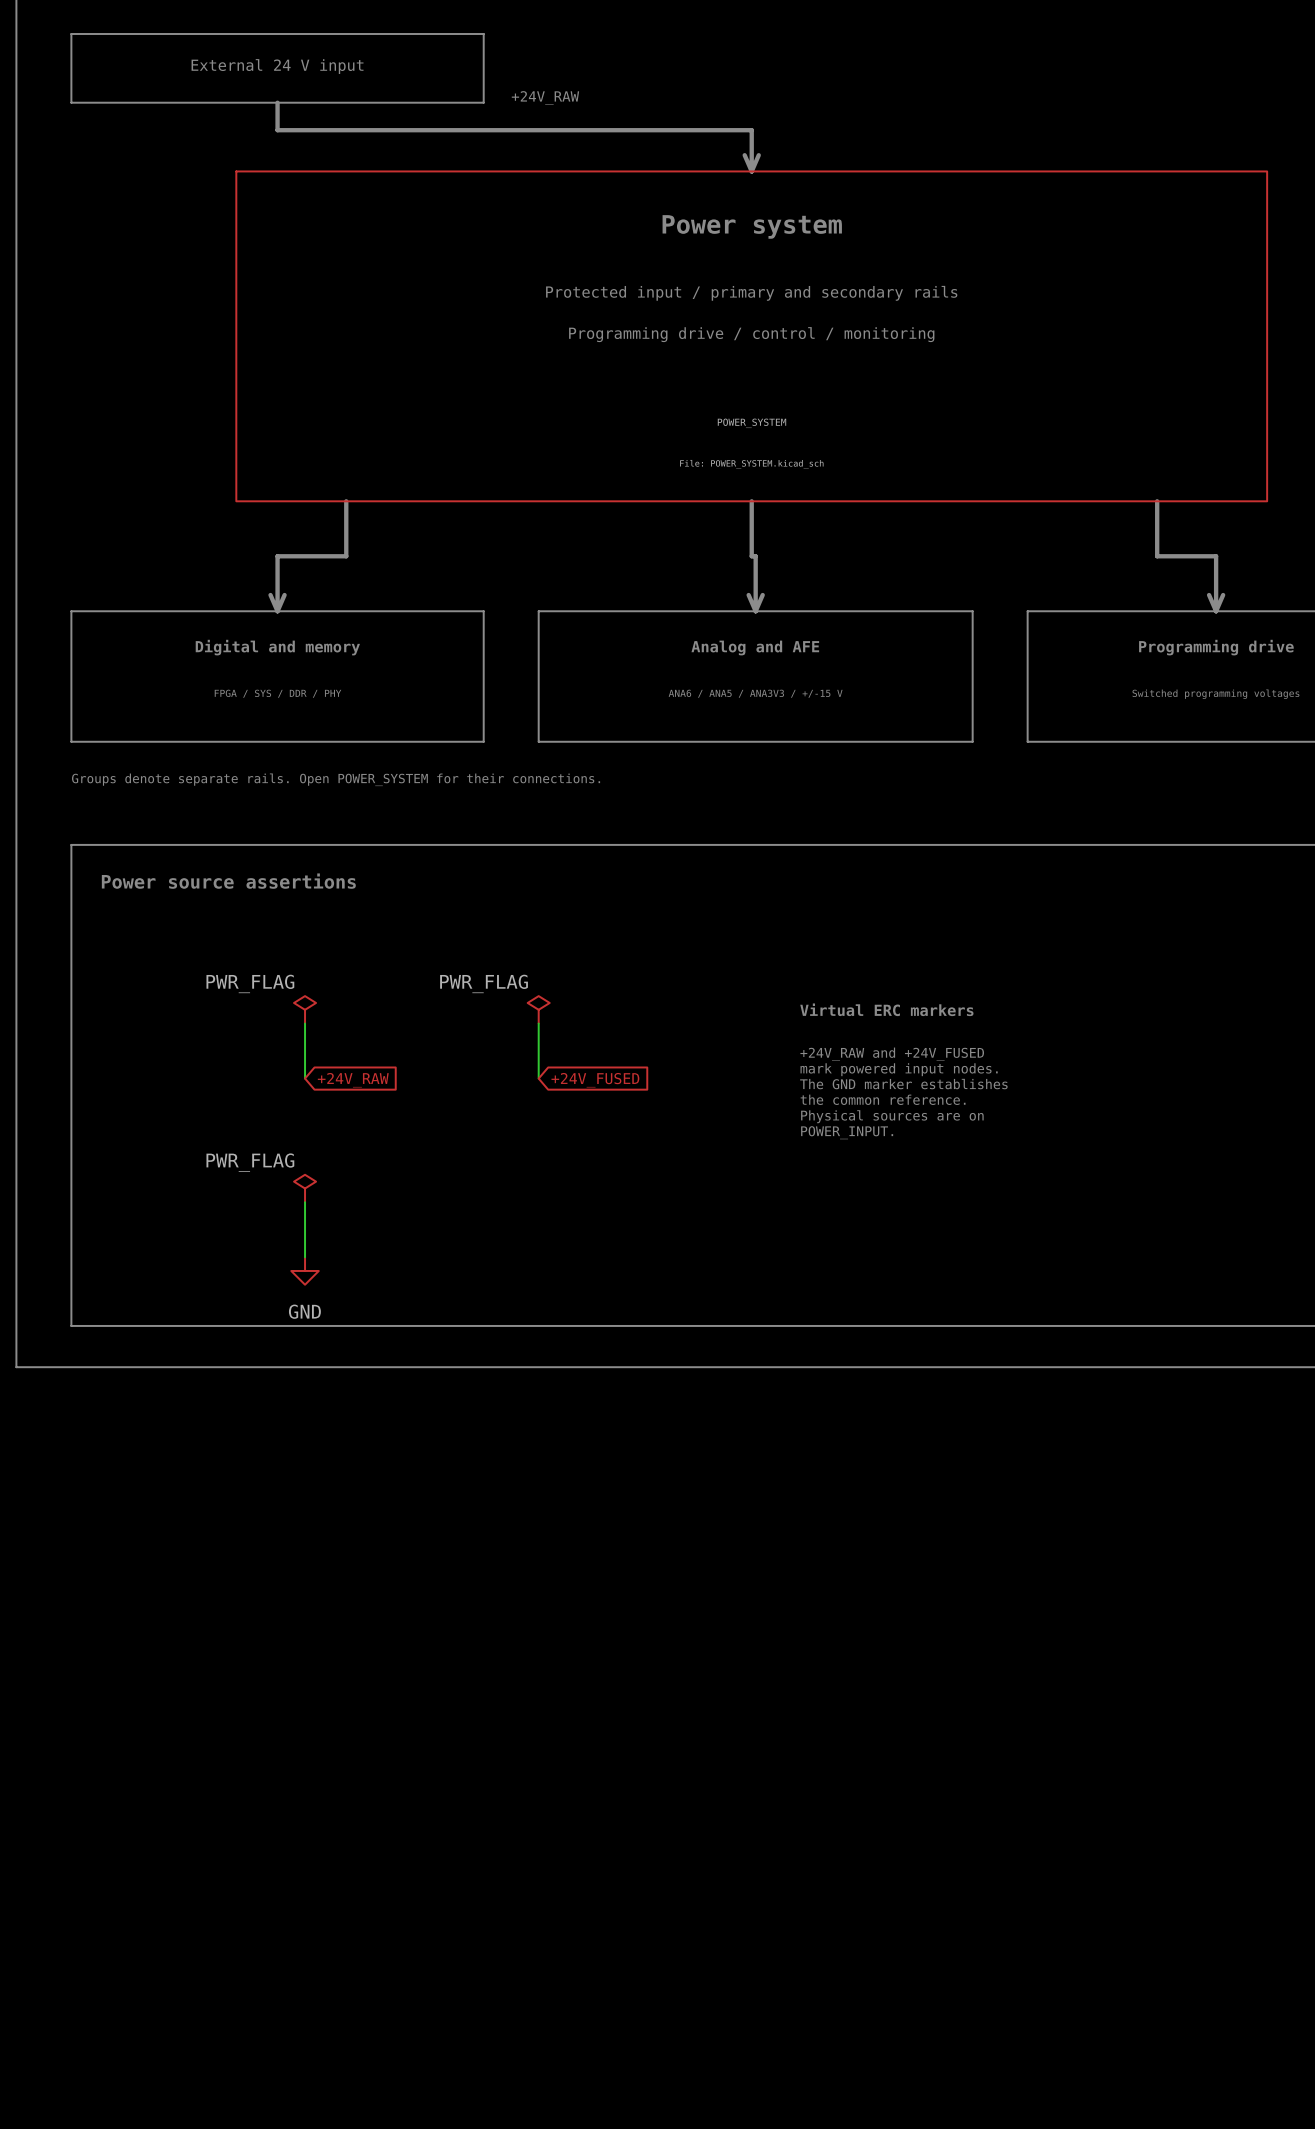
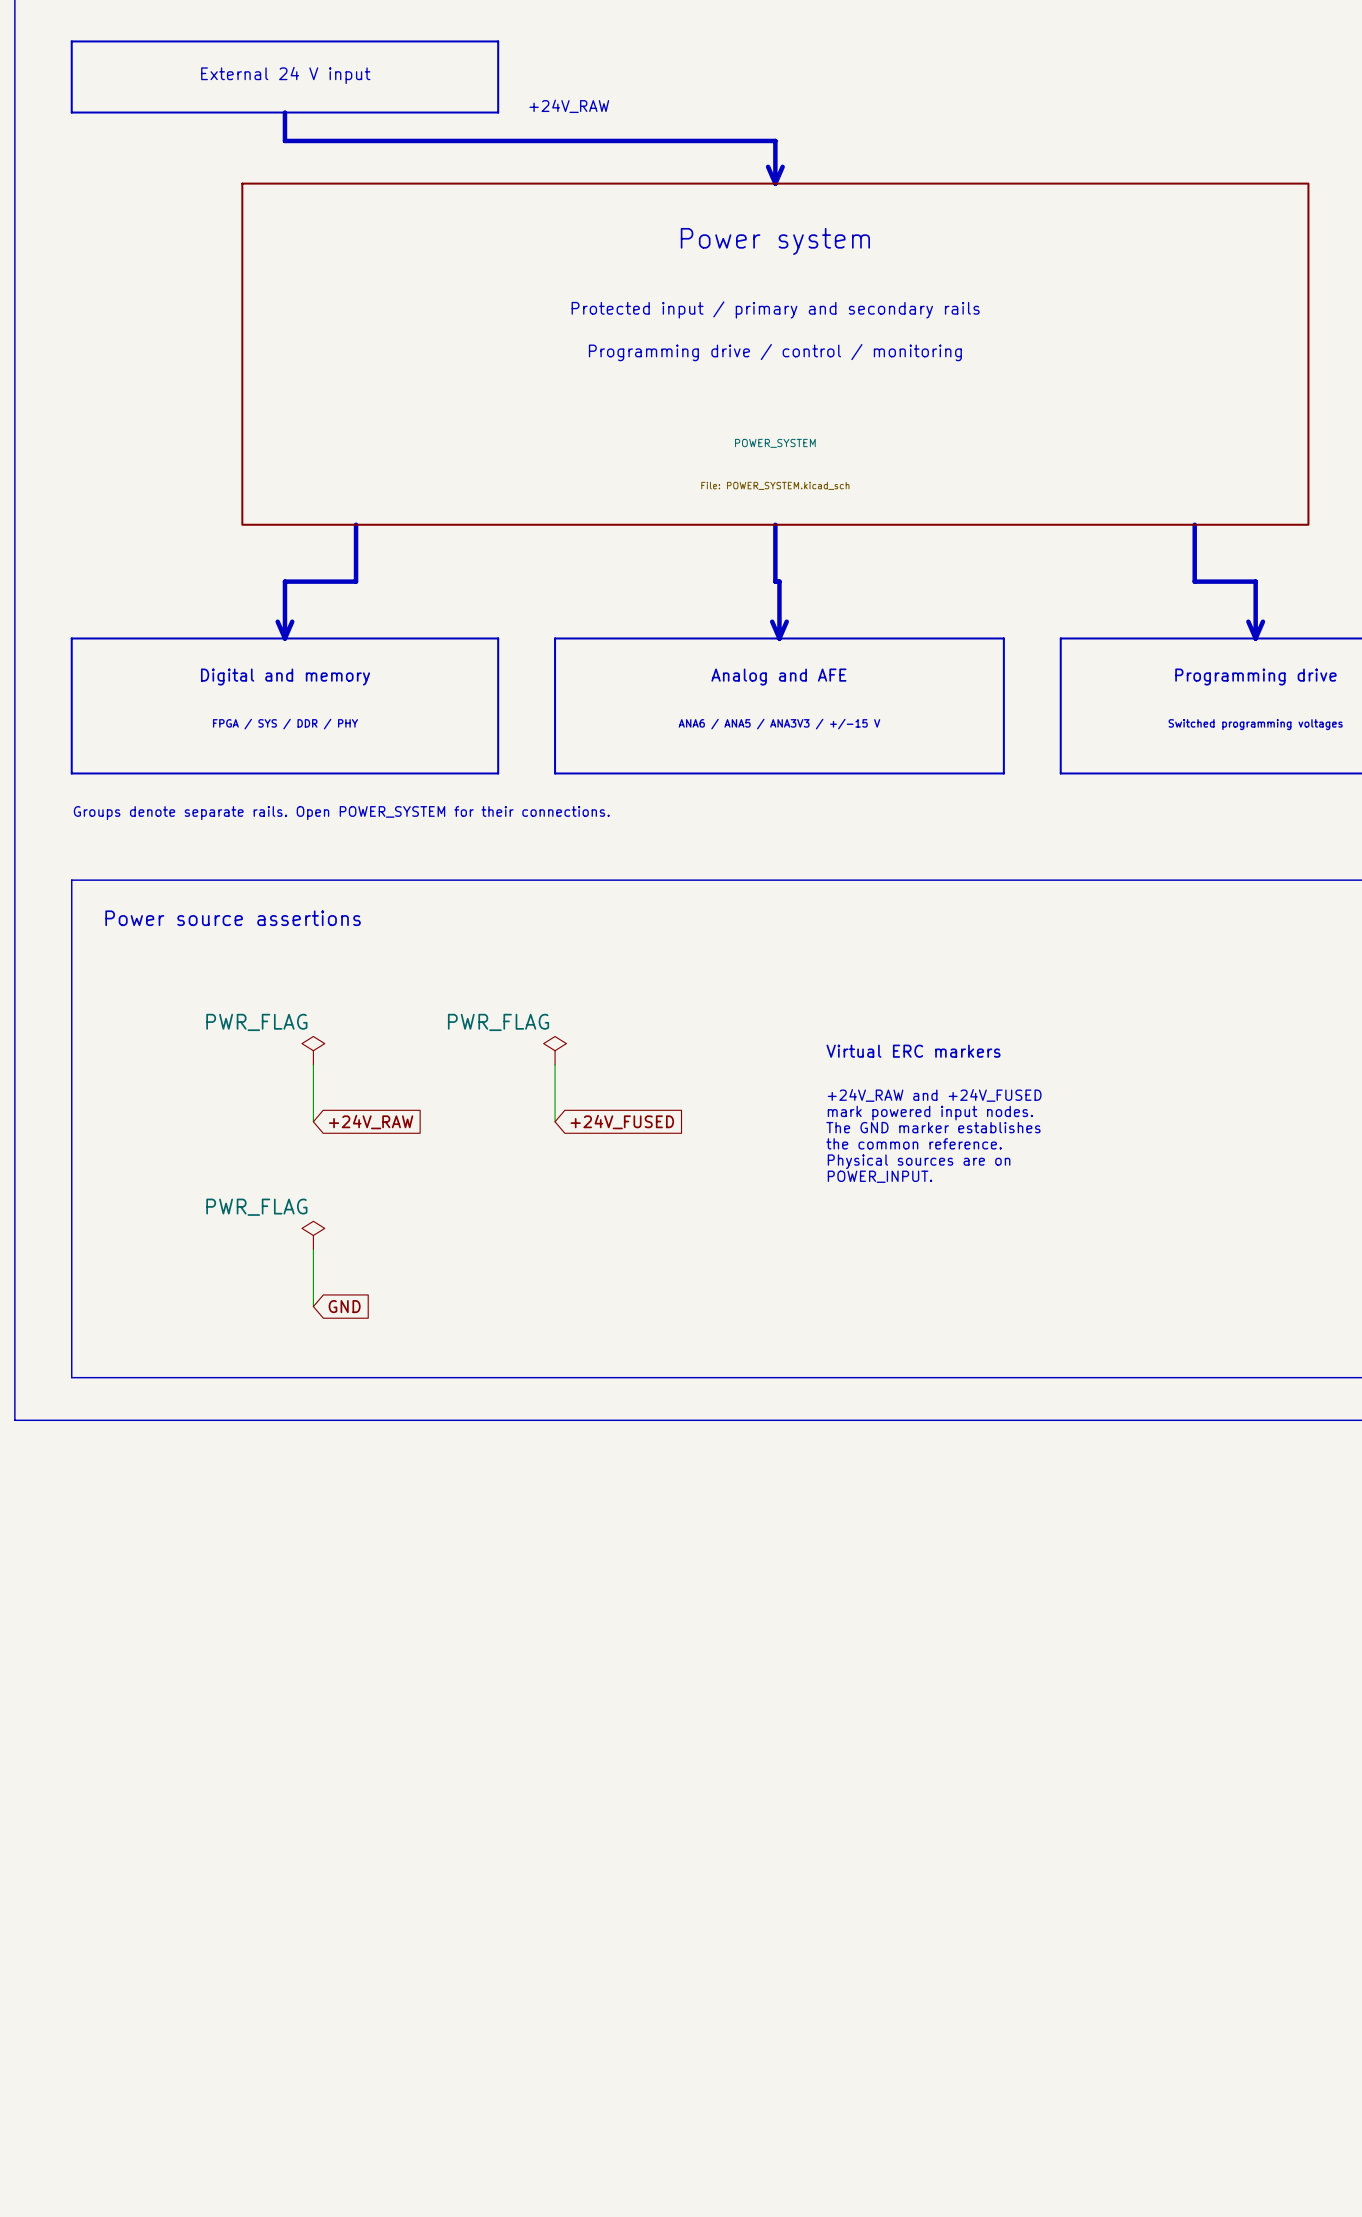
global label: none -> GND (344, 1306)
power symbol: GND (305, 1270) -> none

